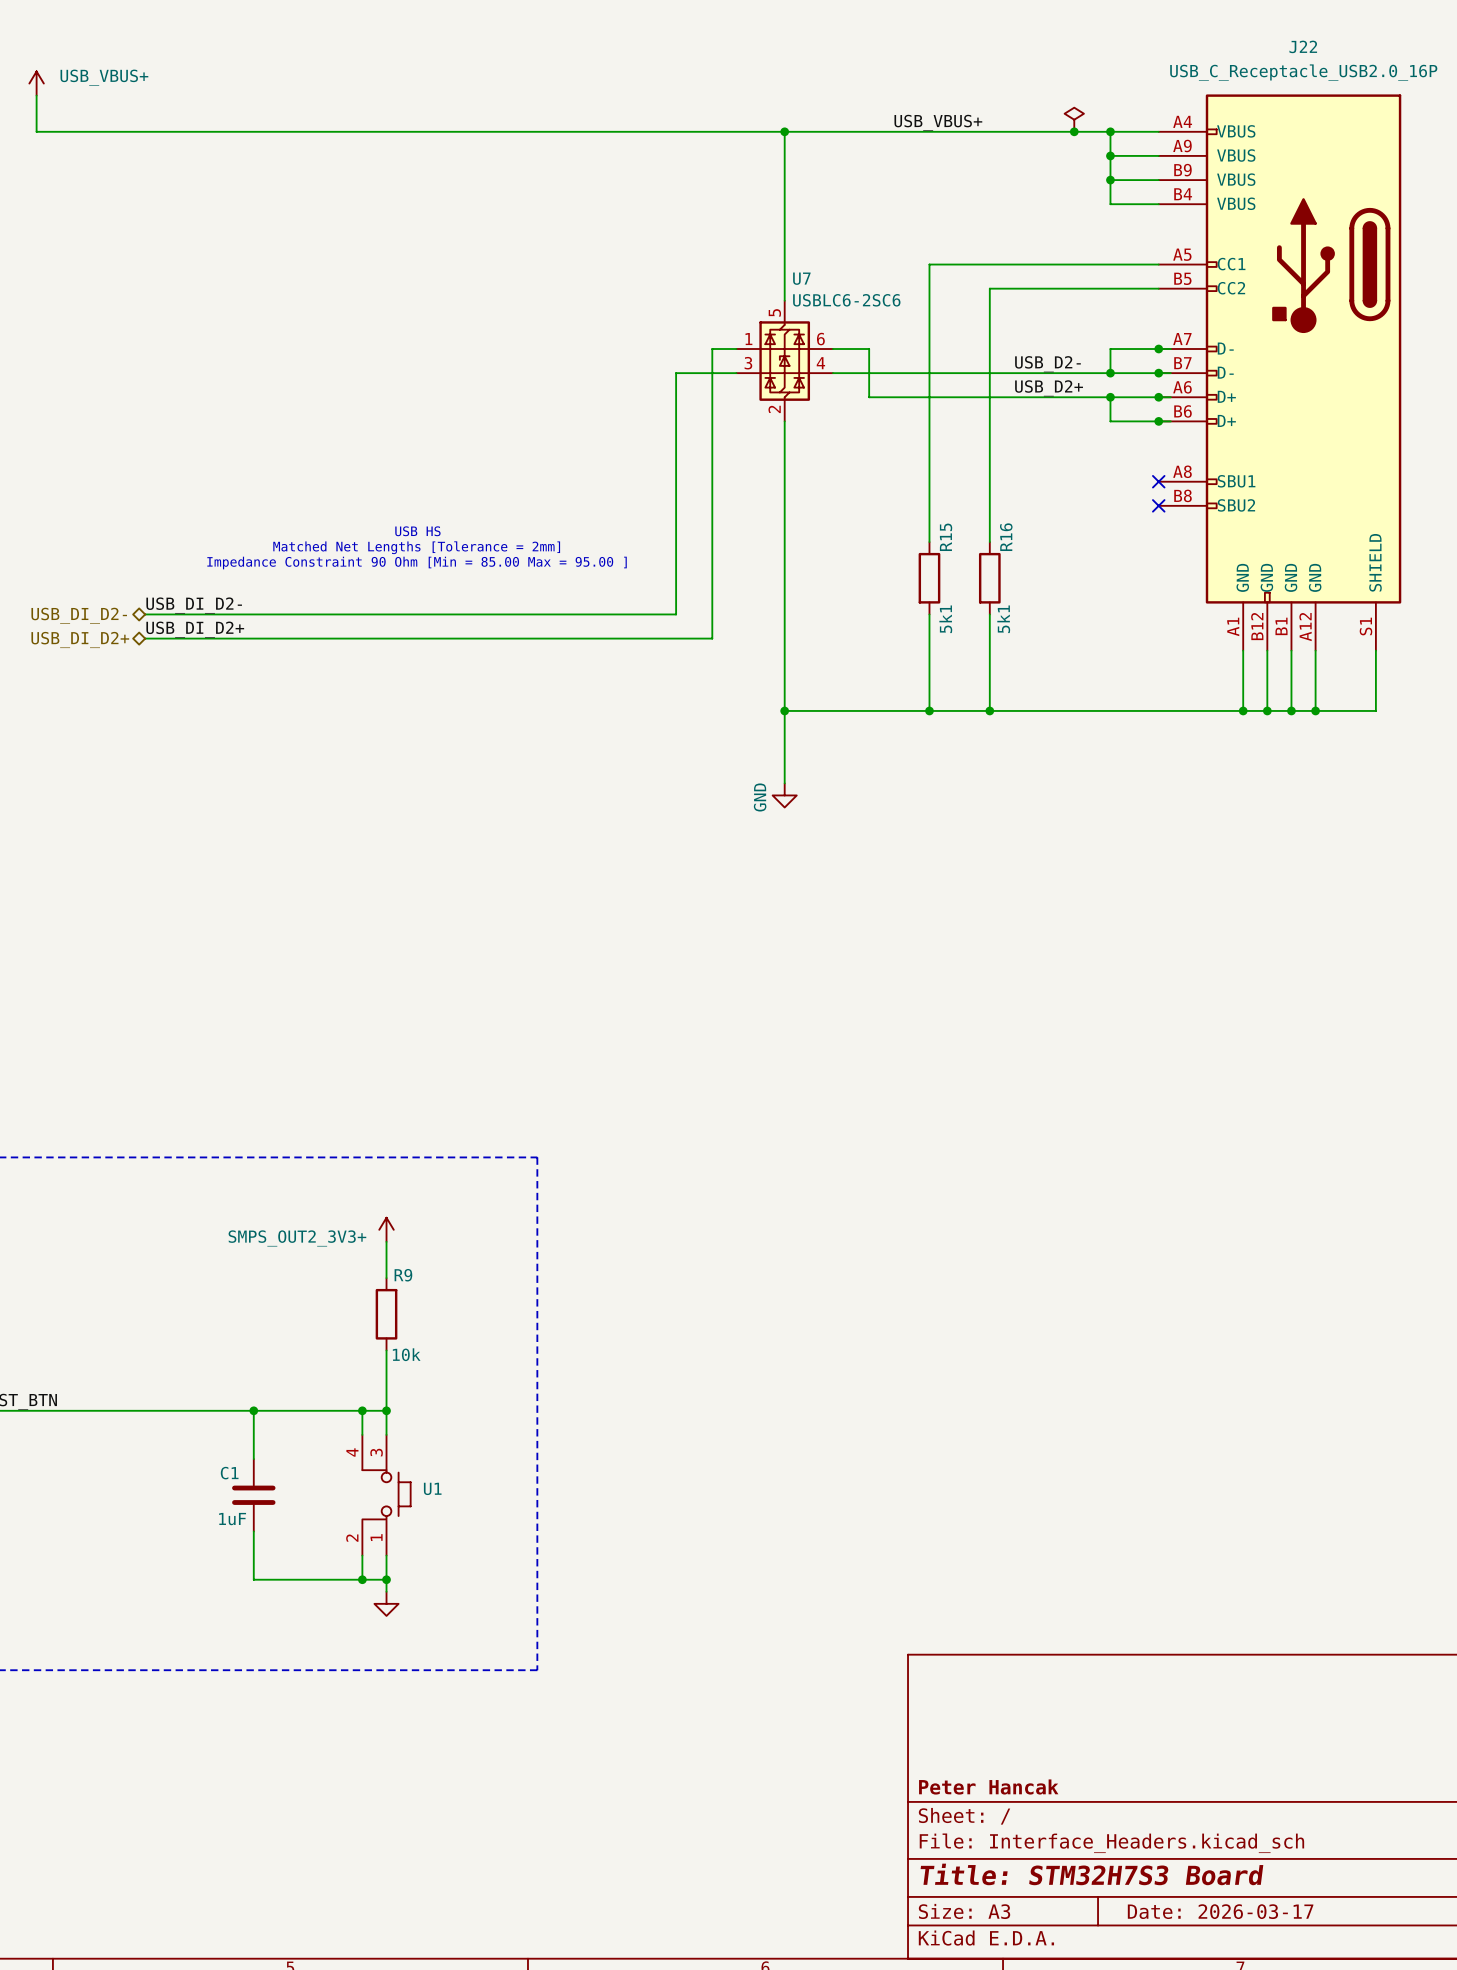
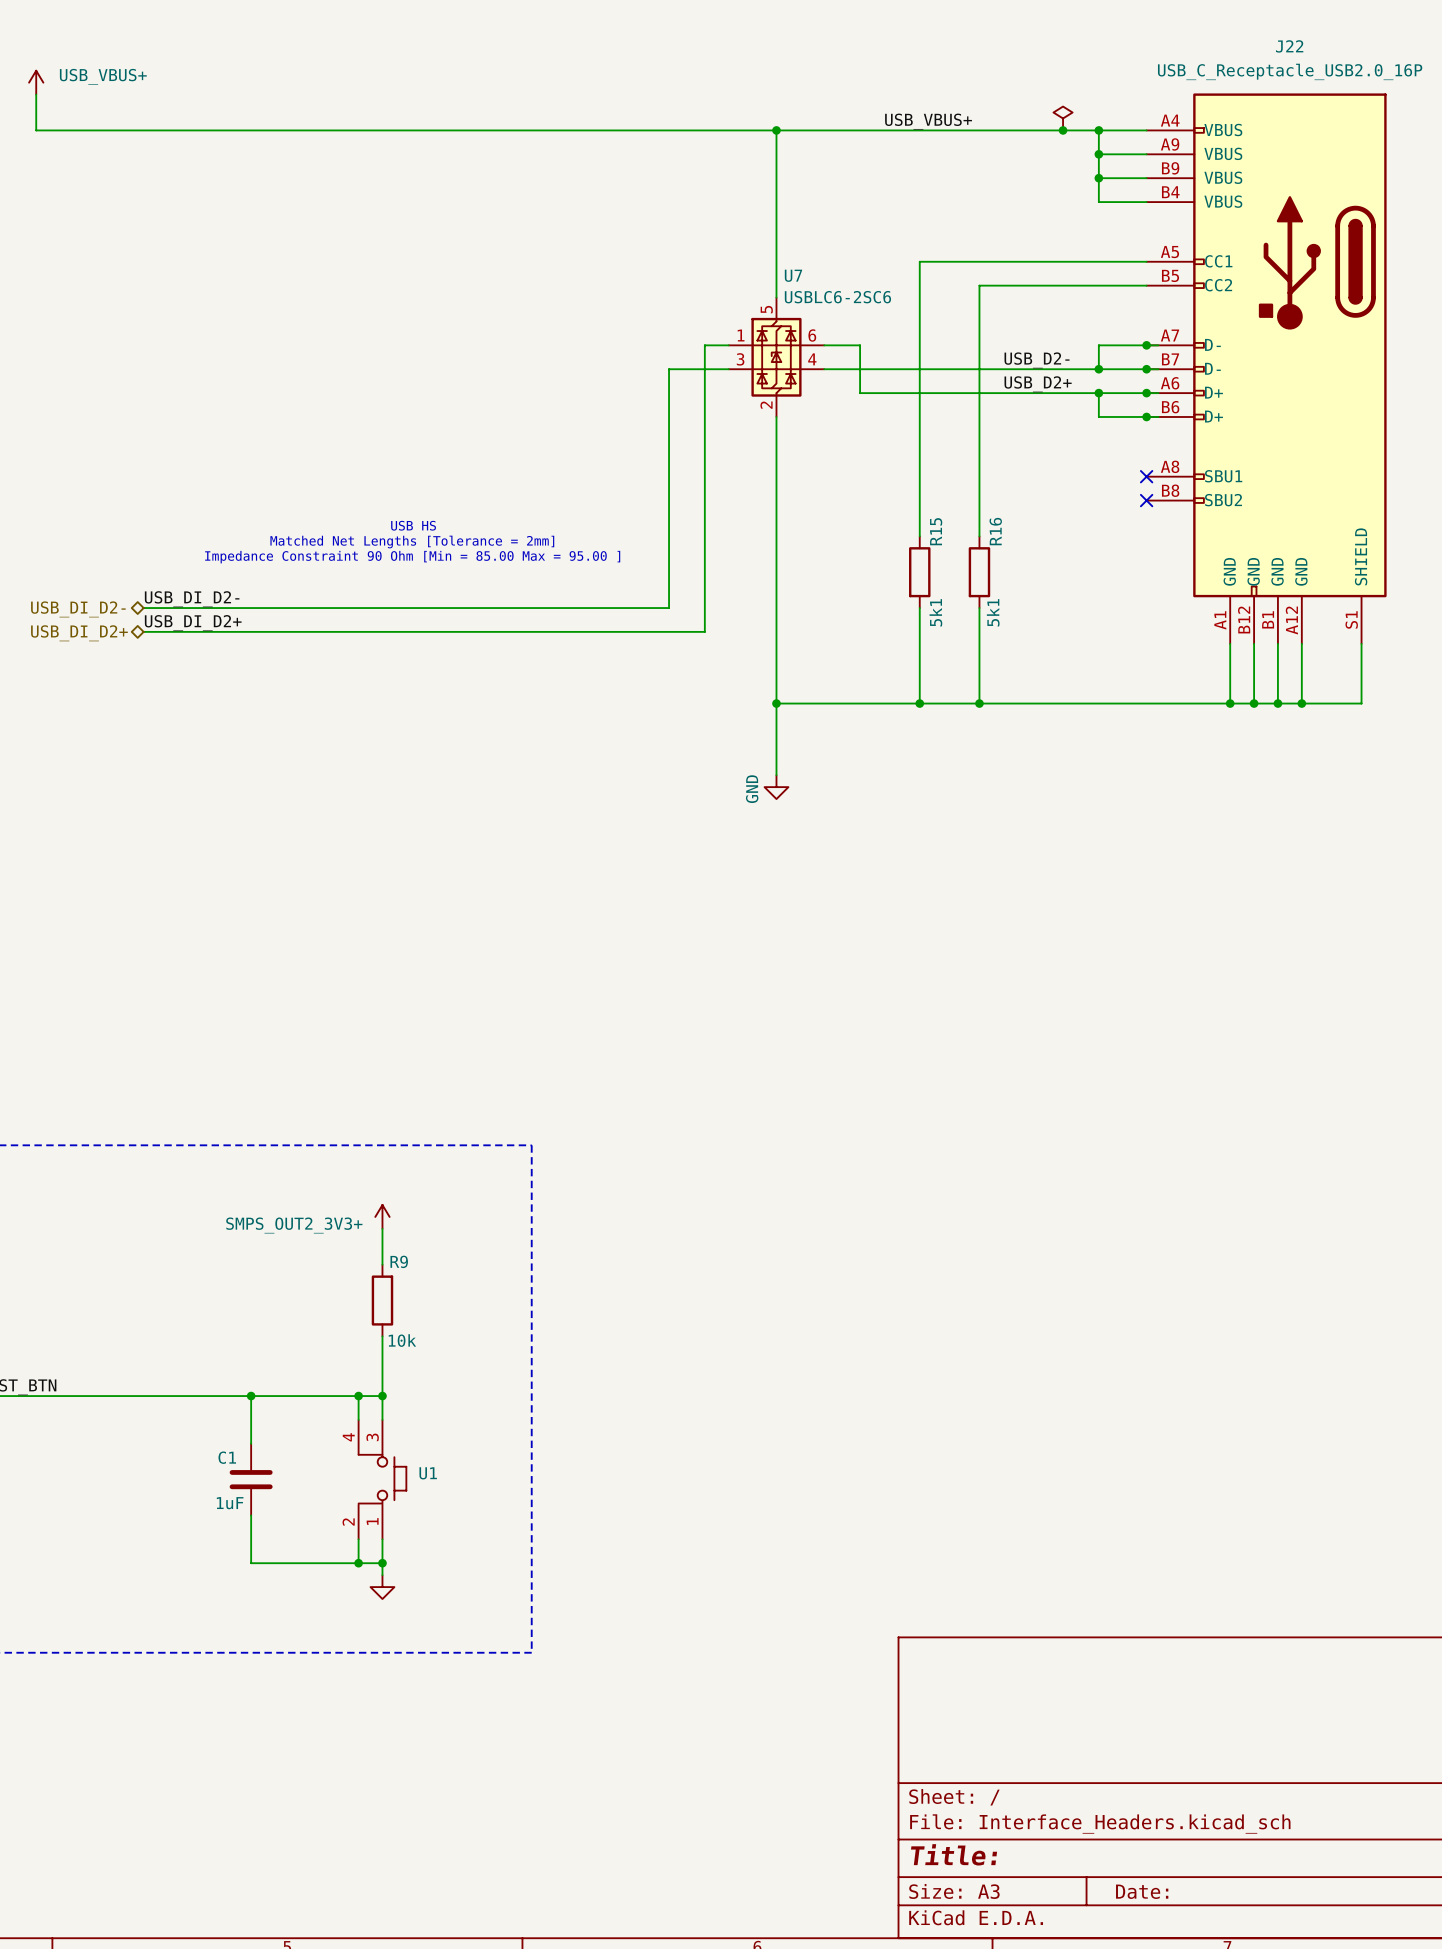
title block: Peter Hancak (988, 1787) -> none
title block: Title: STM32H7S3 Board (1091, 1874) -> Title: (954, 1854)
title block: Date: 2026-03-17 (1220, 1911) -> Date: (1142, 1891)

